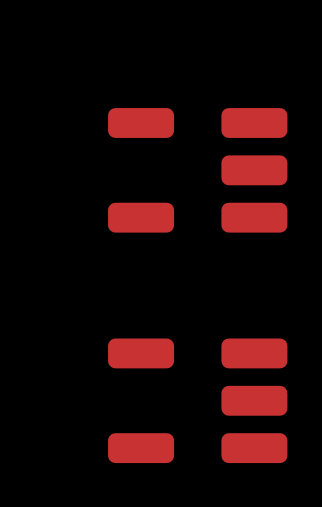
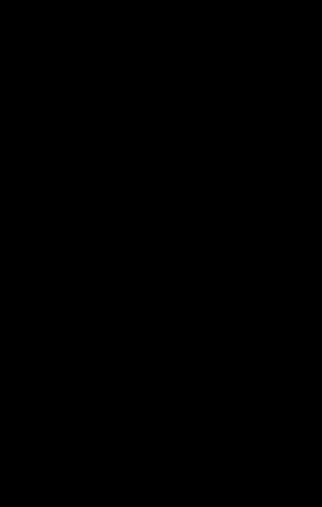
part: (197, 170) -> none
part: (197, 400) -> none

